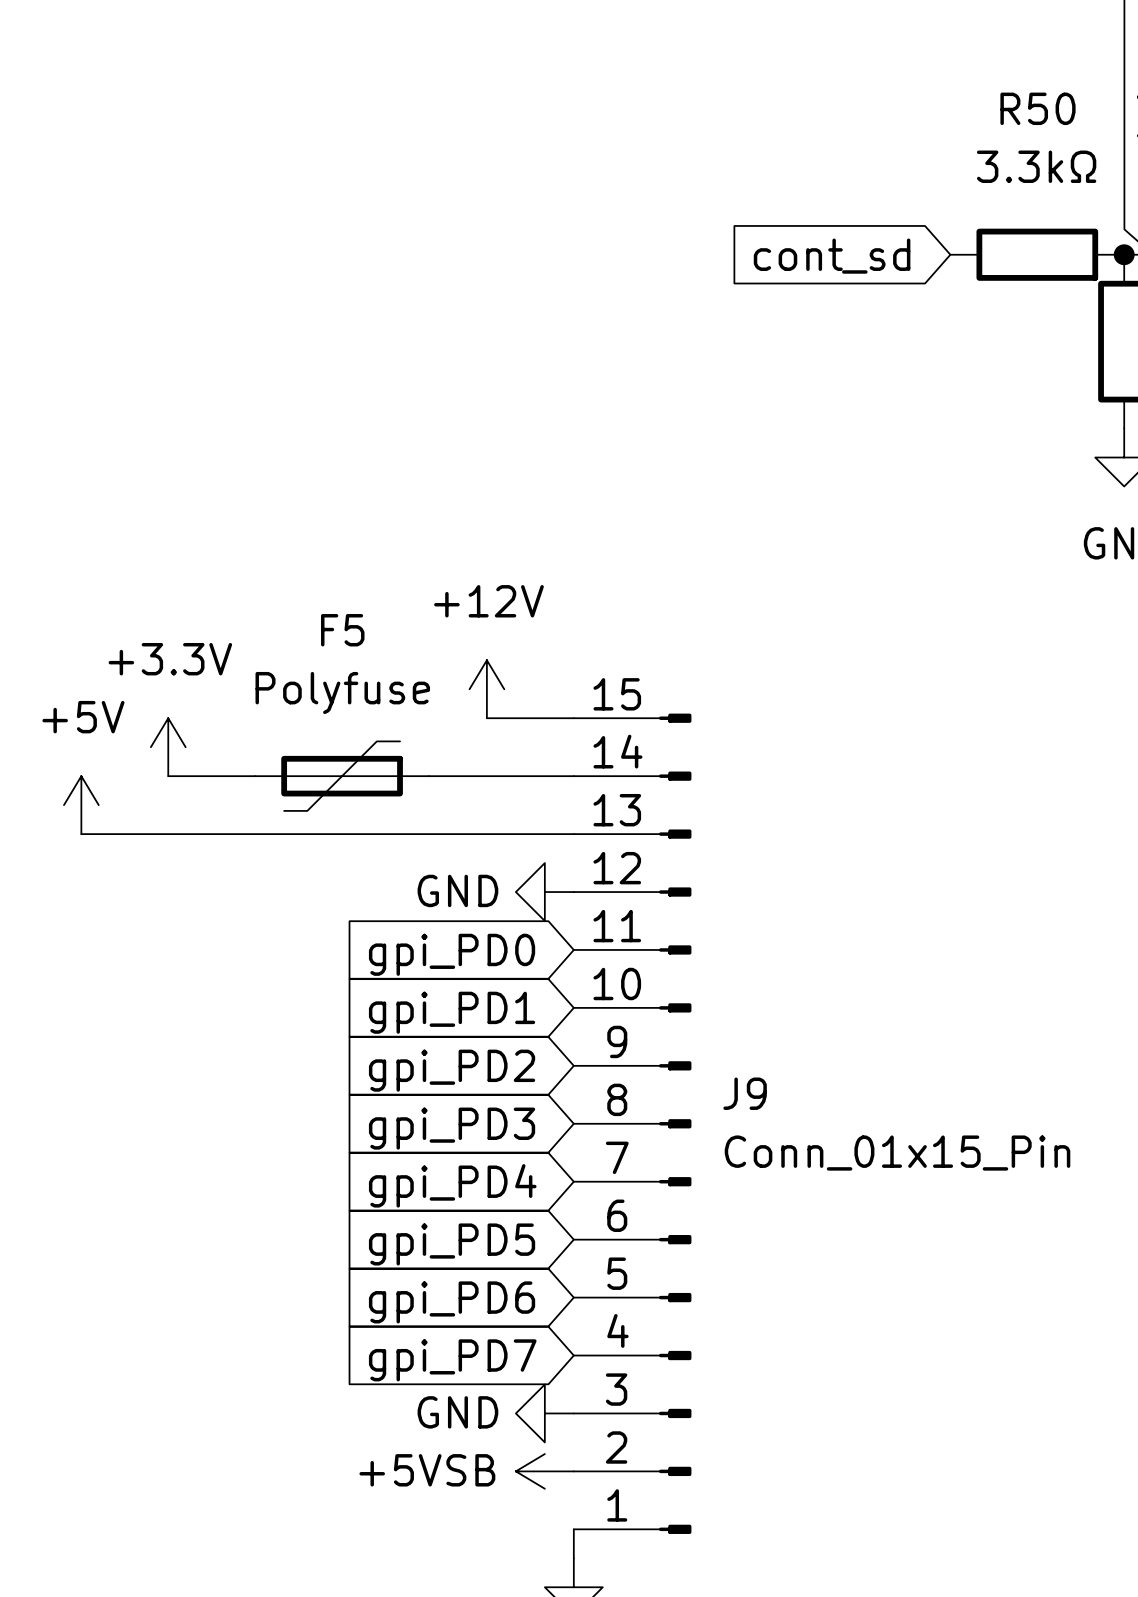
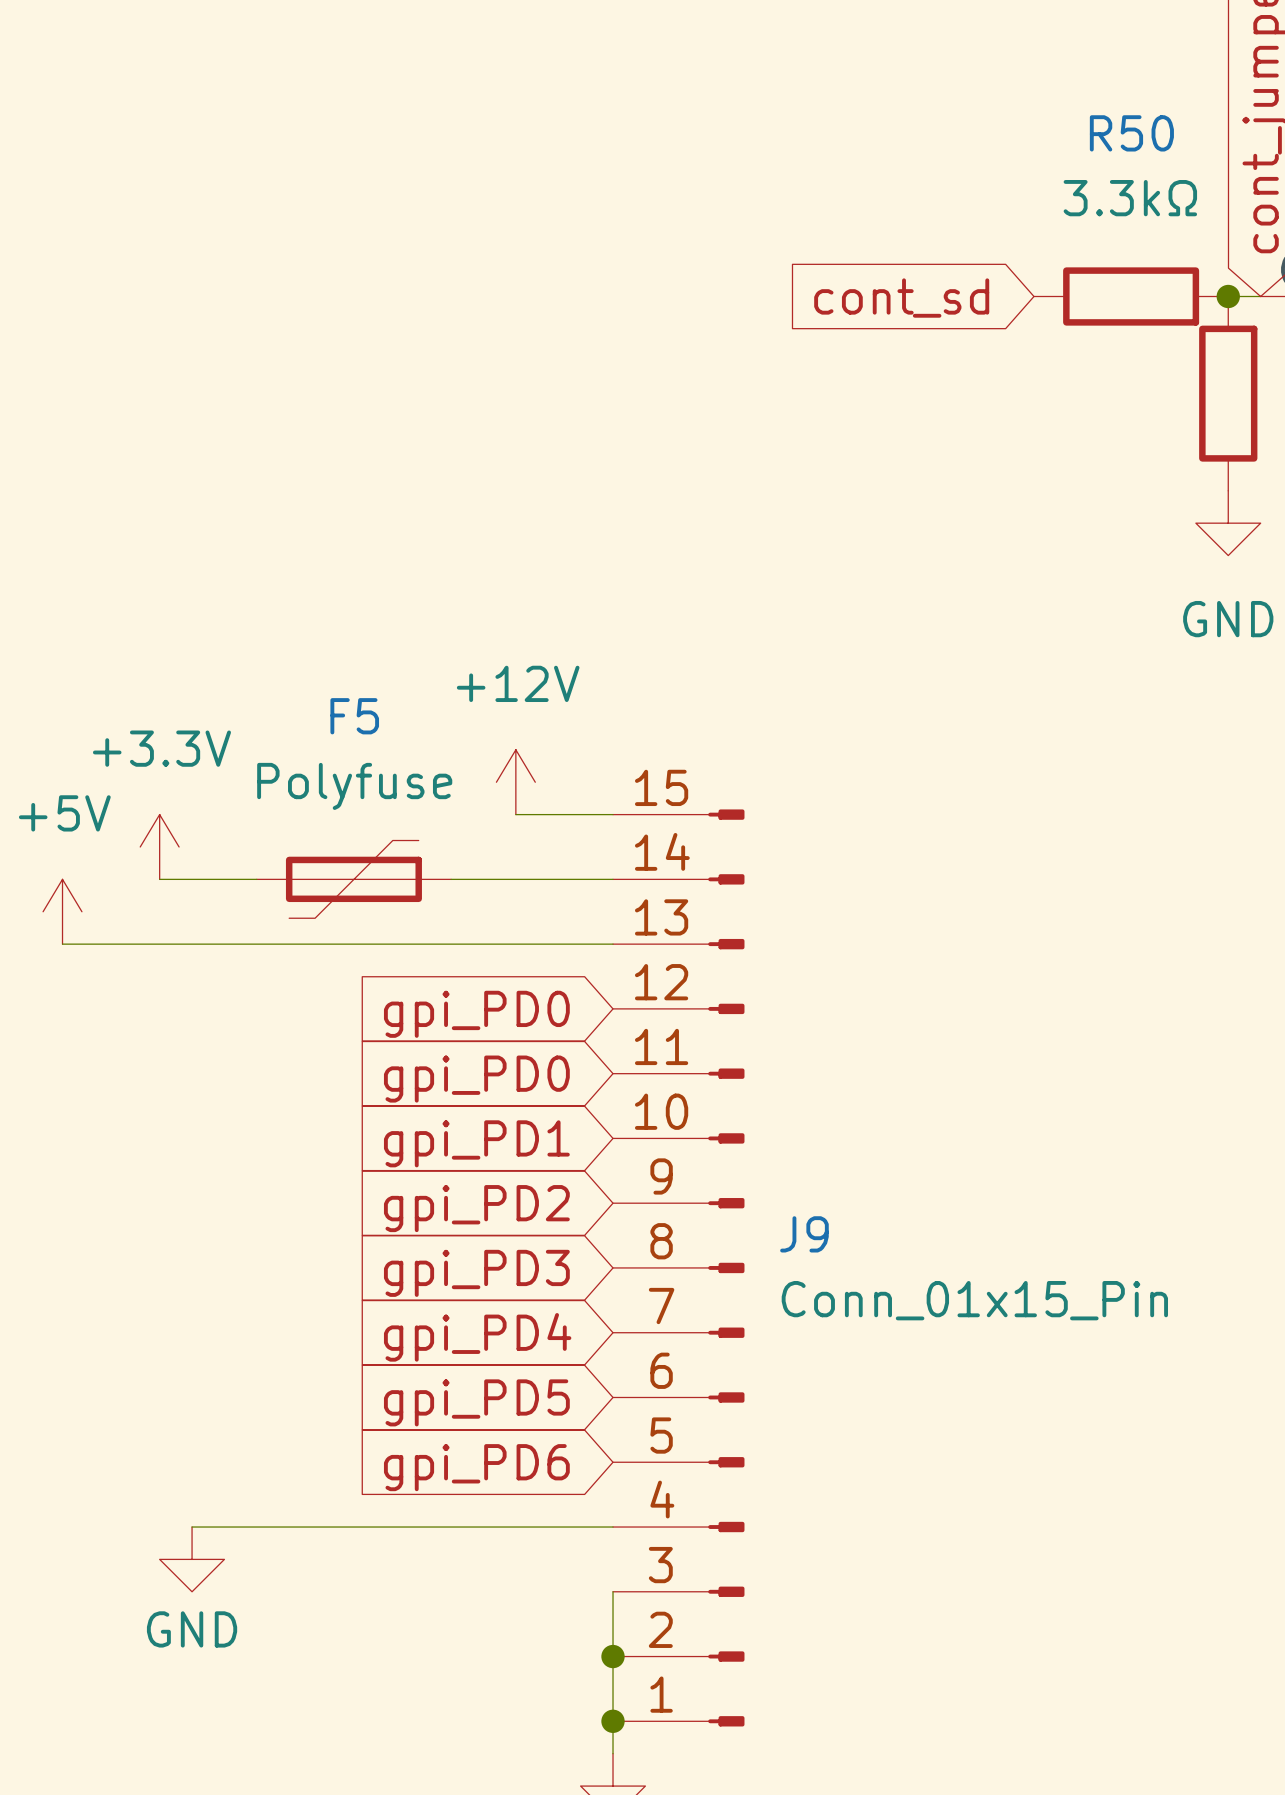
power symbol: GND (544, 892) -> none
global label: none -> gpi_PD0 (476, 1014)
wire: none -> (192, 1527) (613, 1527)
global label: gpi_PD7 (452, 1360) -> none
power symbol: none -> GND (192, 1559)
power symbol: GND (544, 1413) -> none
wire: none -> (613, 1591) (613, 1721)
power symbol: +5VSB (544, 1471) -> none
junction: none -> (613, 1656)
junction: none -> (613, 1721)

